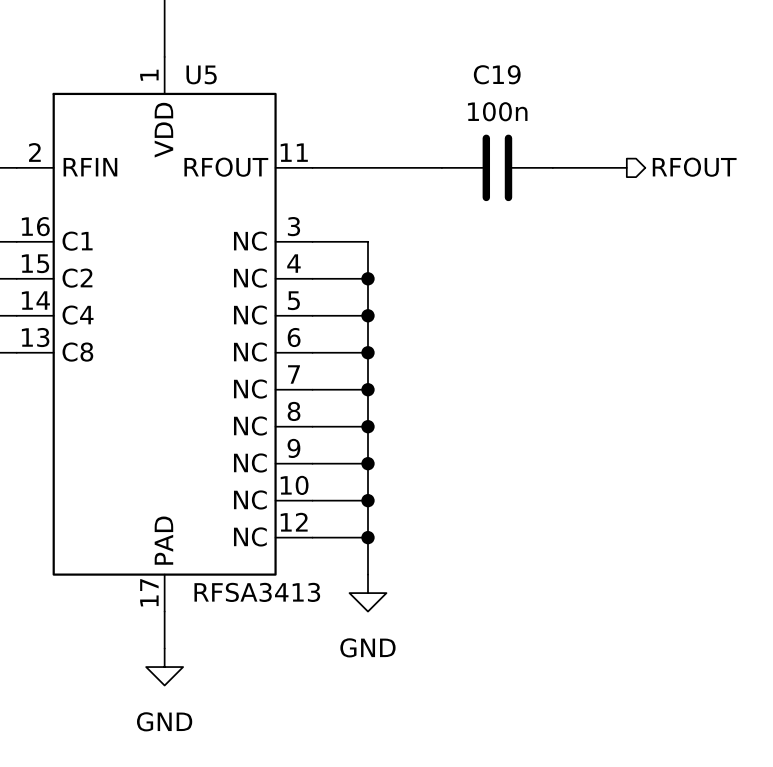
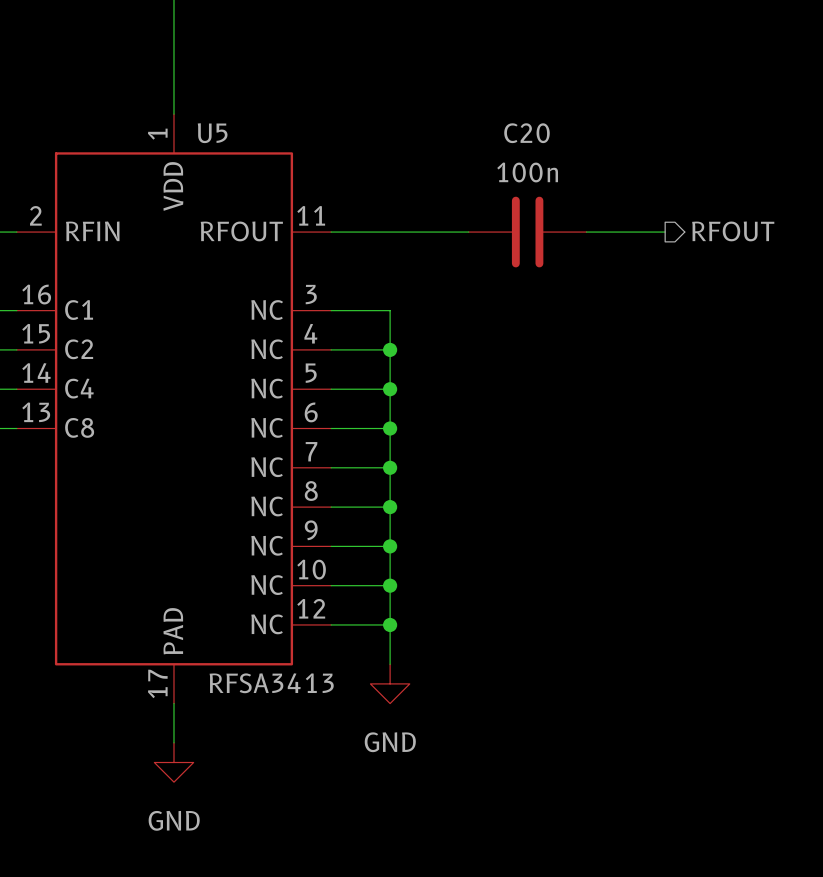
C19 name: C19 (497, 74) -> C20 (526, 133)

